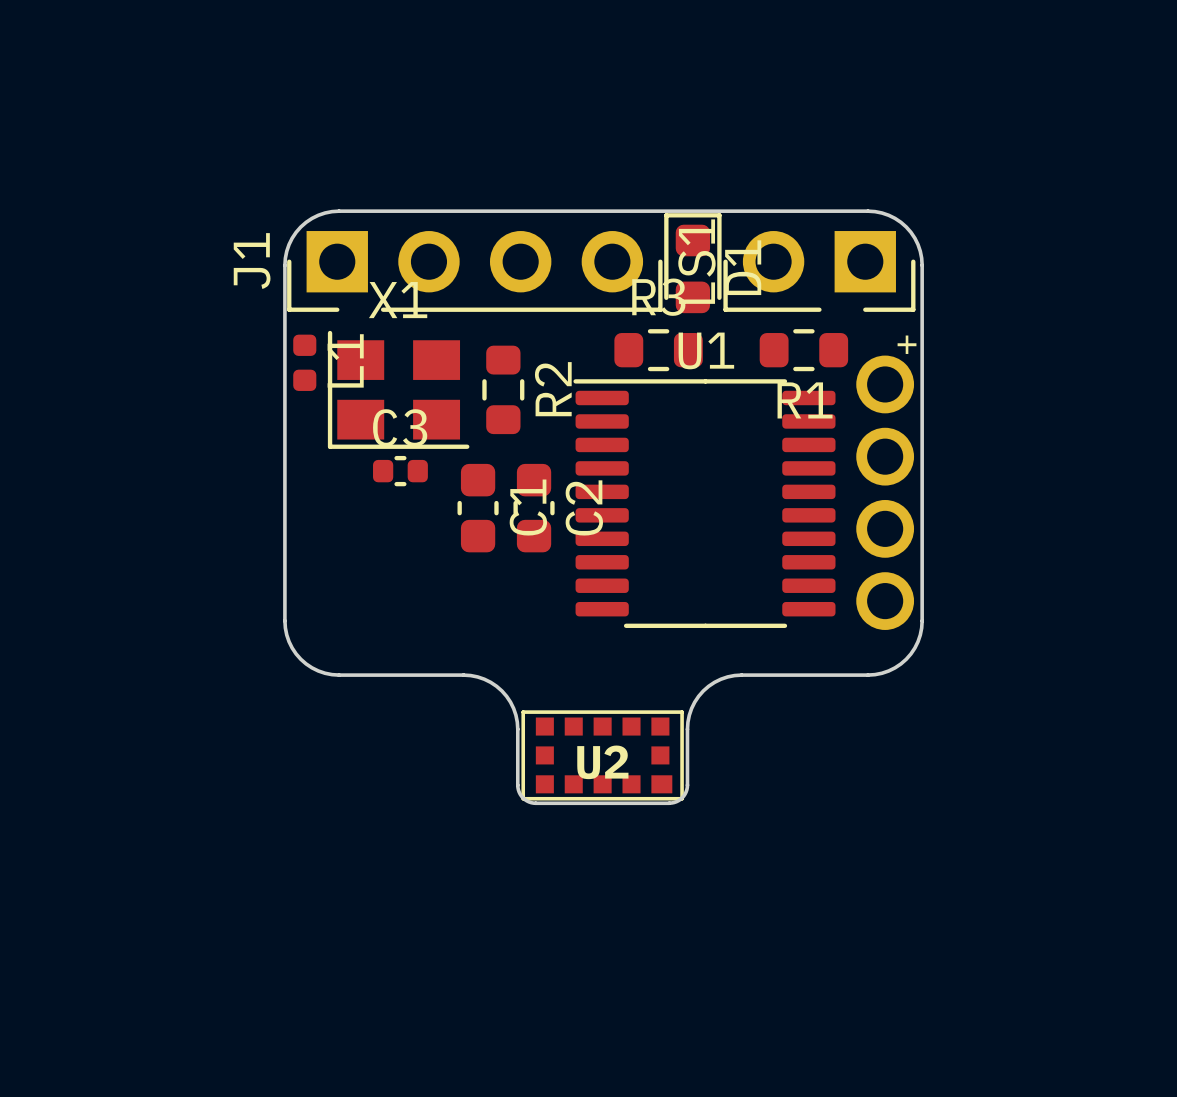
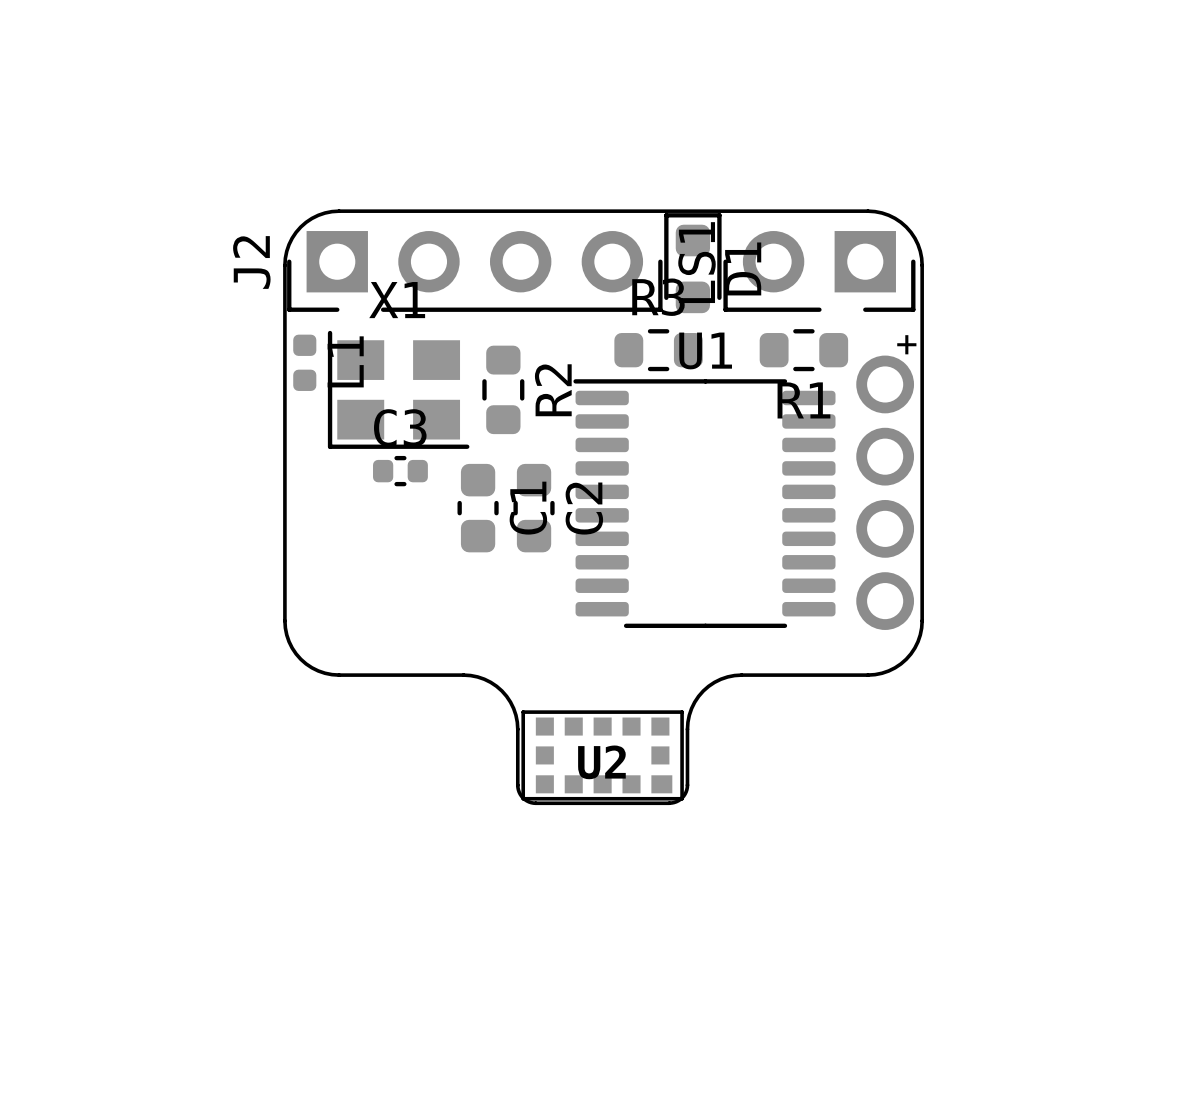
J1 name: J1 (252, 261) -> J2 (251, 262)

